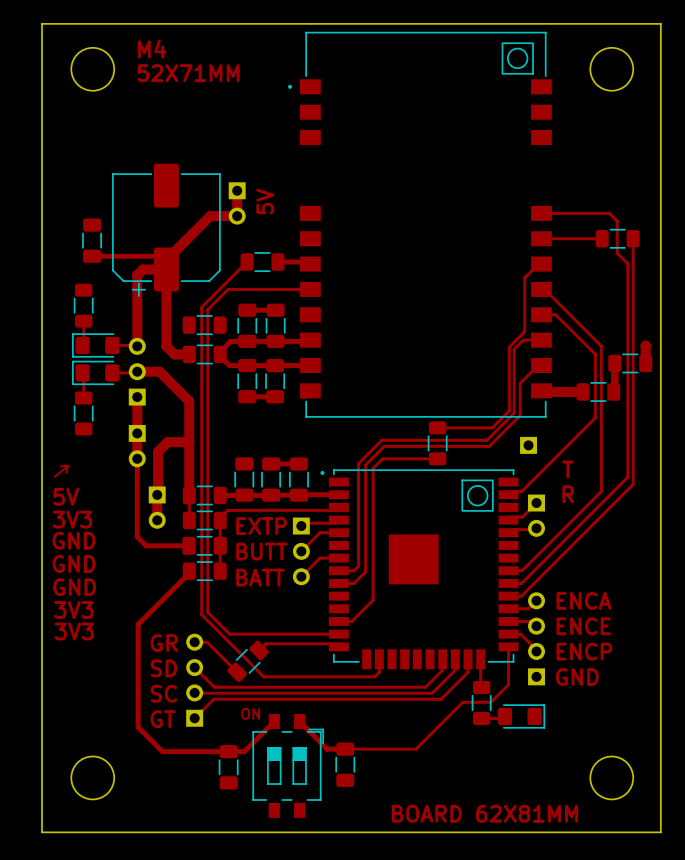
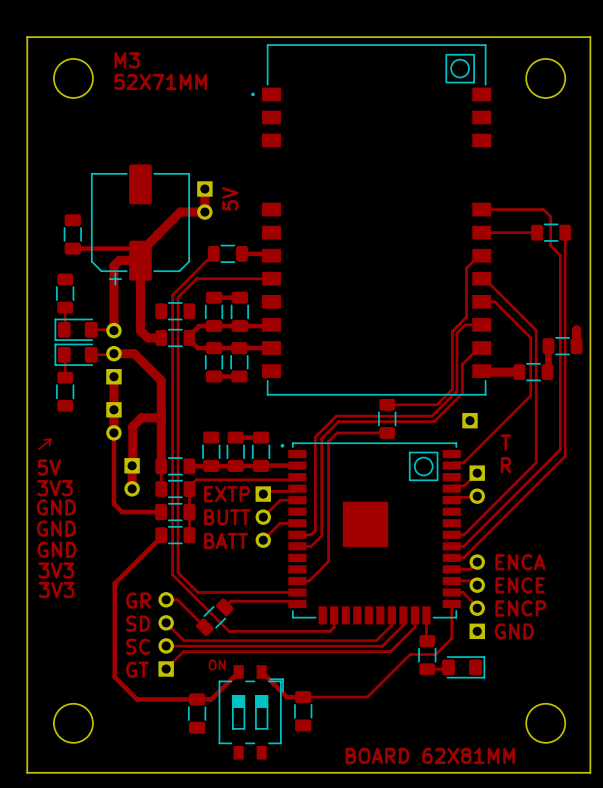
text: M4 (152, 49) -> M3 (127, 60)

